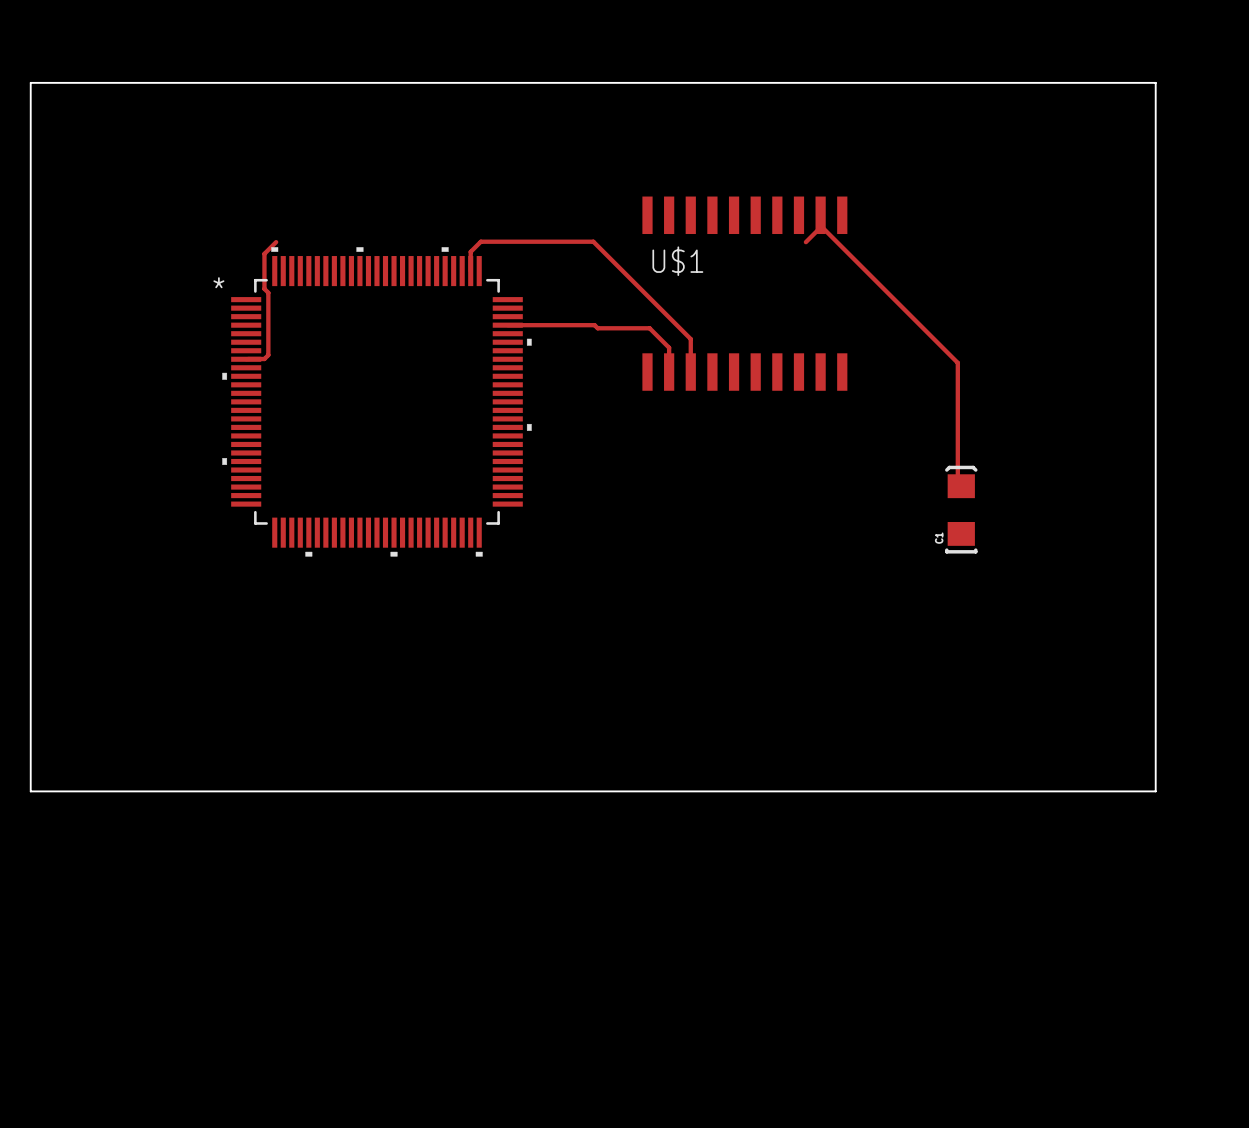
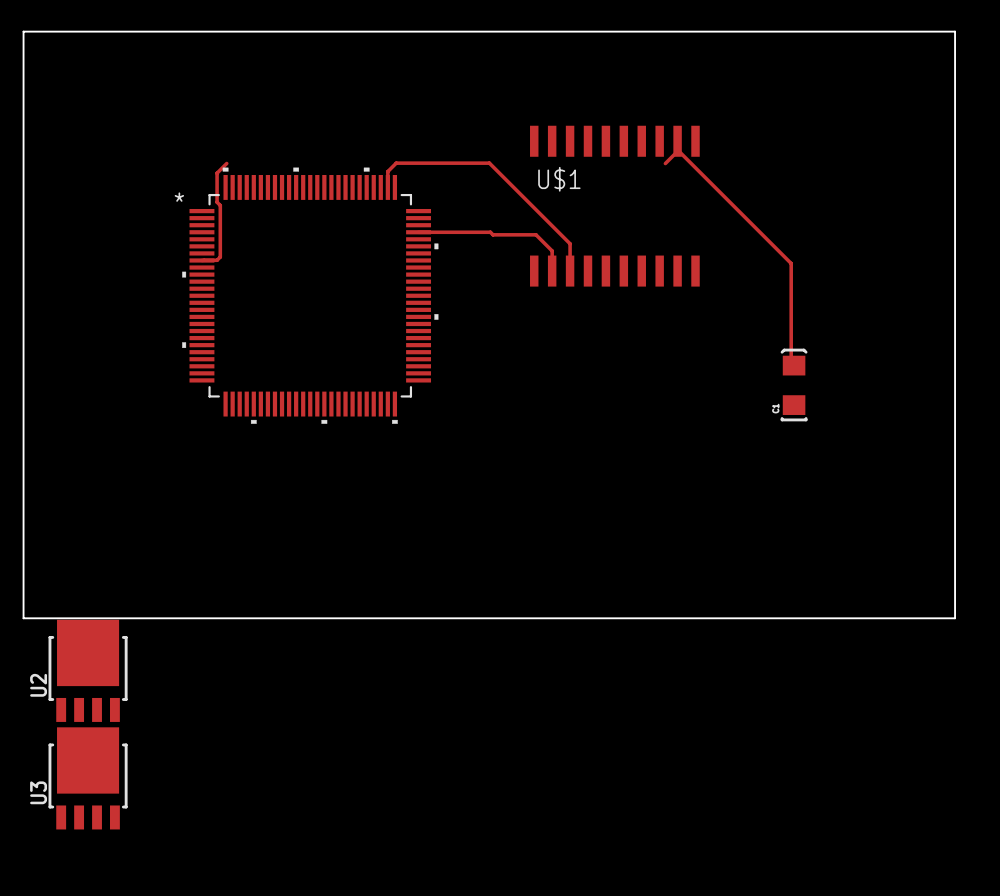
U2: none -> (88, 670)
U3: none -> (88, 778)

